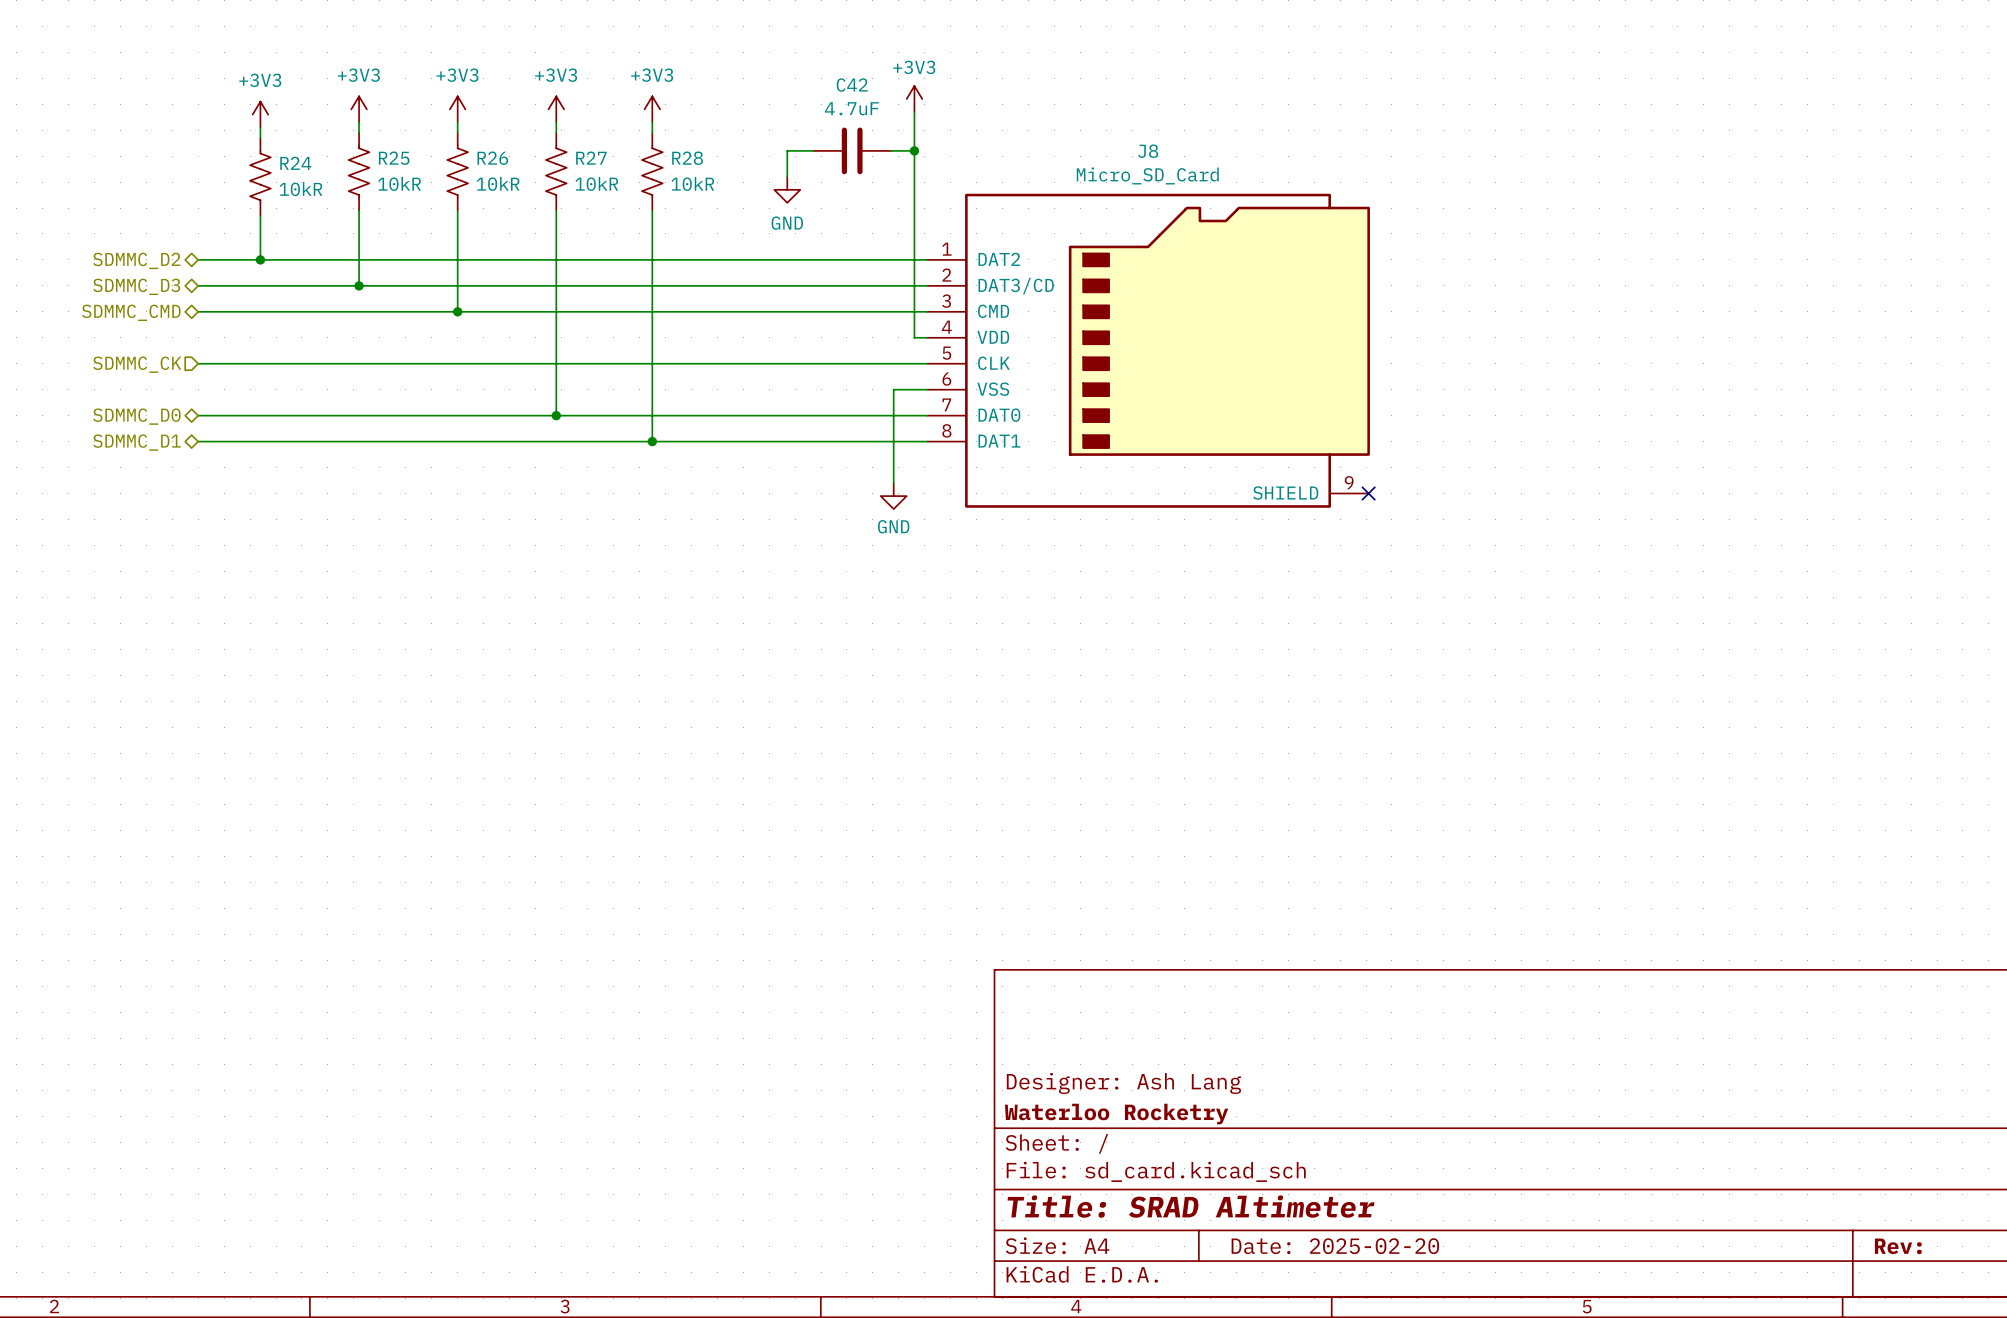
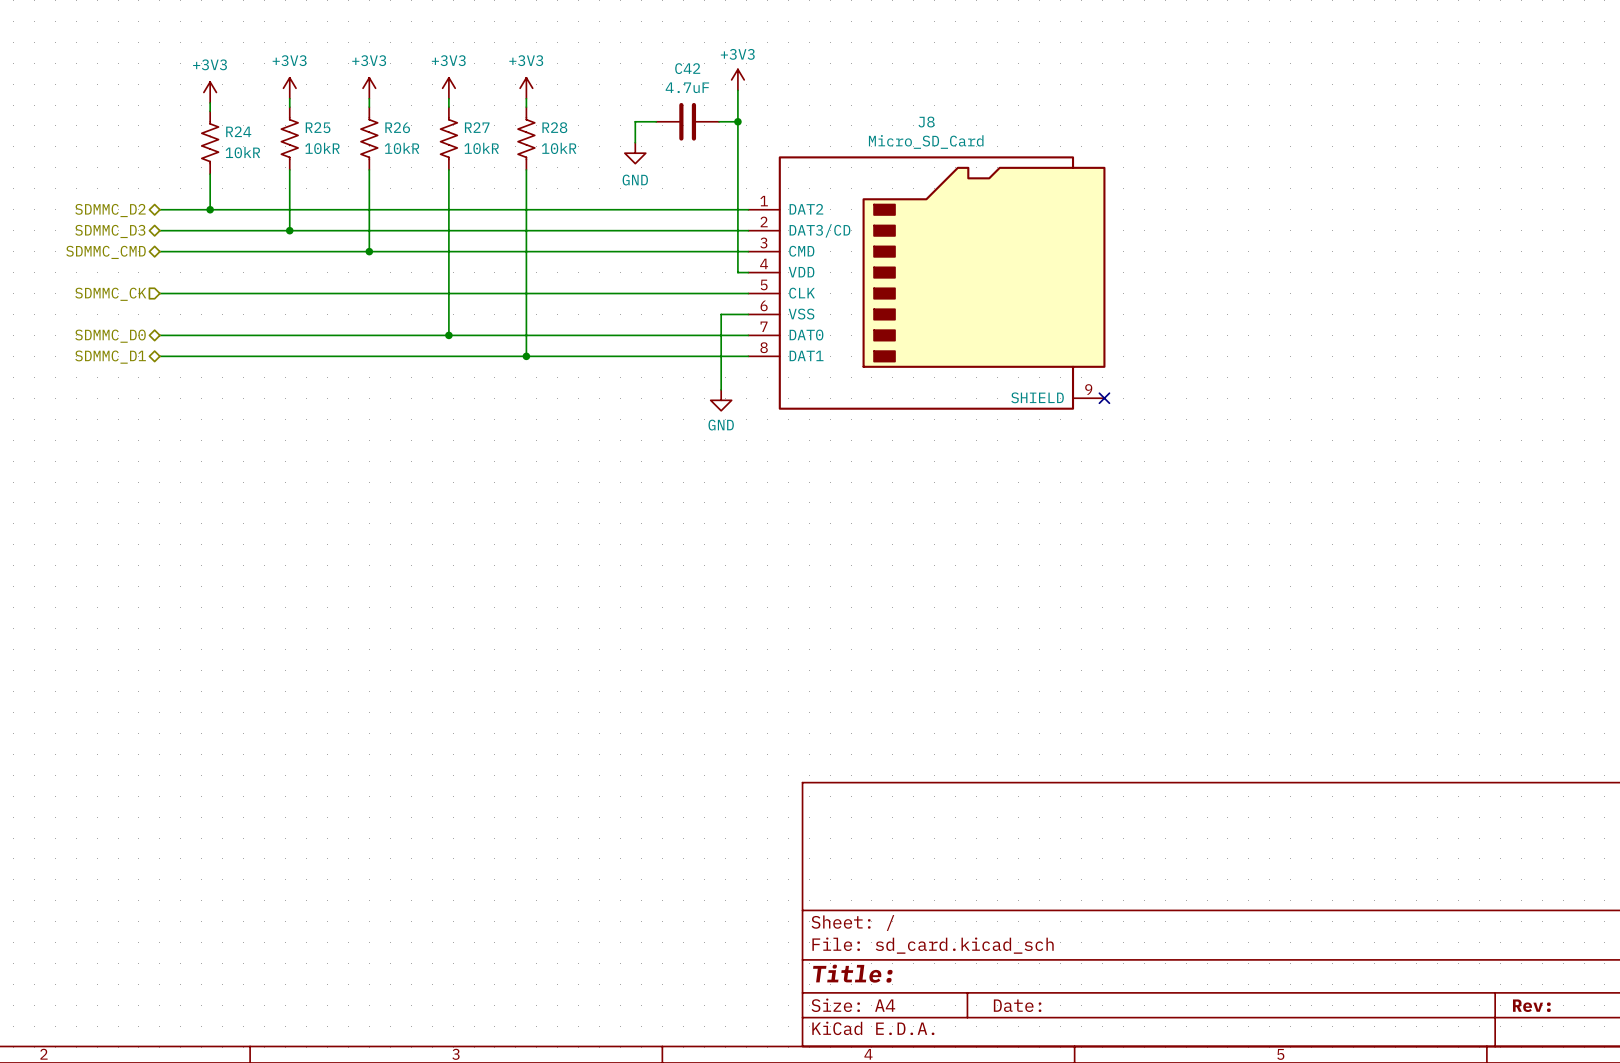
title block: Designer: Ash Lang (1123, 1083) -> none
title block: Waterloo Rocketry (1116, 1114) -> none
title block: Title: SRAD Altimeter (1190, 1206) -> Title: (852, 973)
title block: Date: 2025-02-20 (1335, 1246) -> Date: (1017, 1005)

